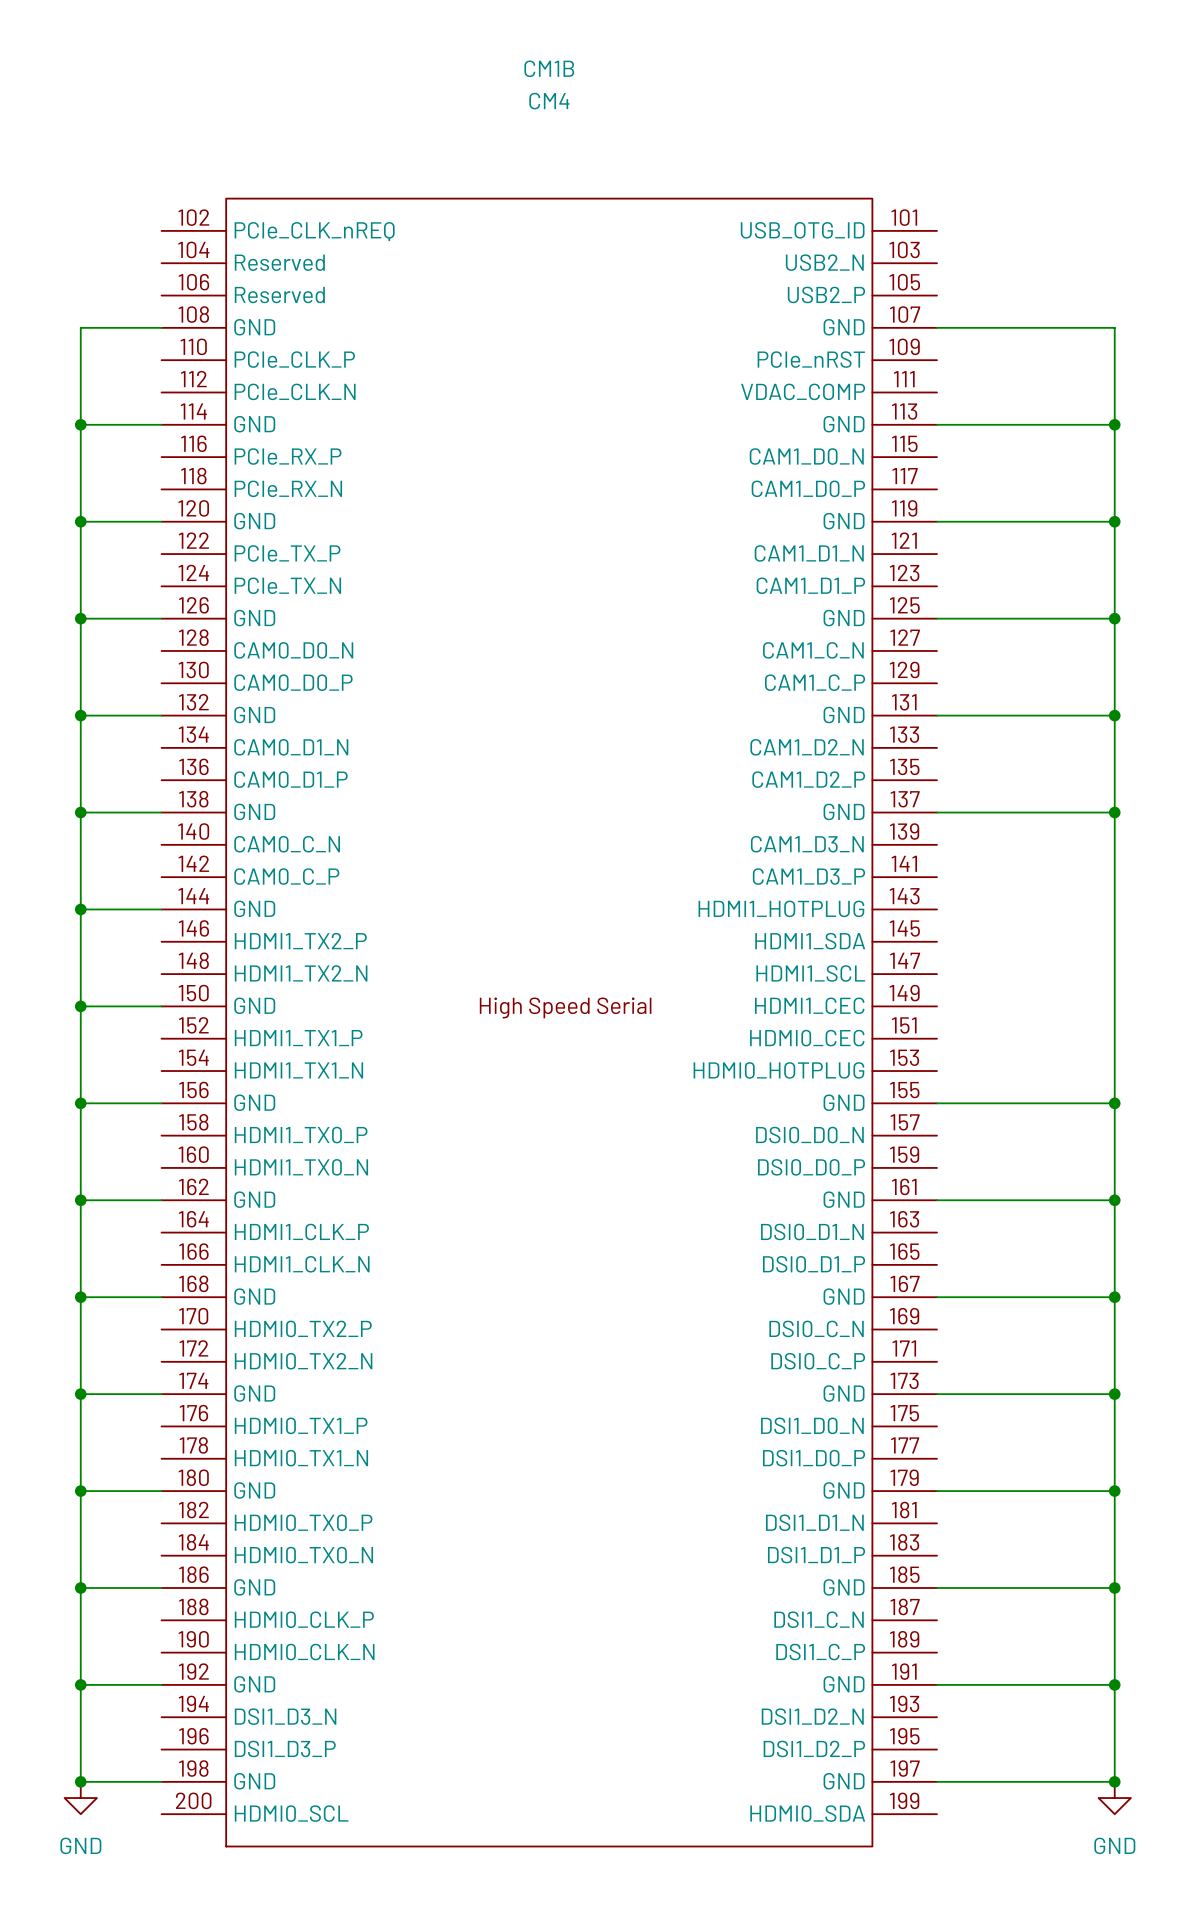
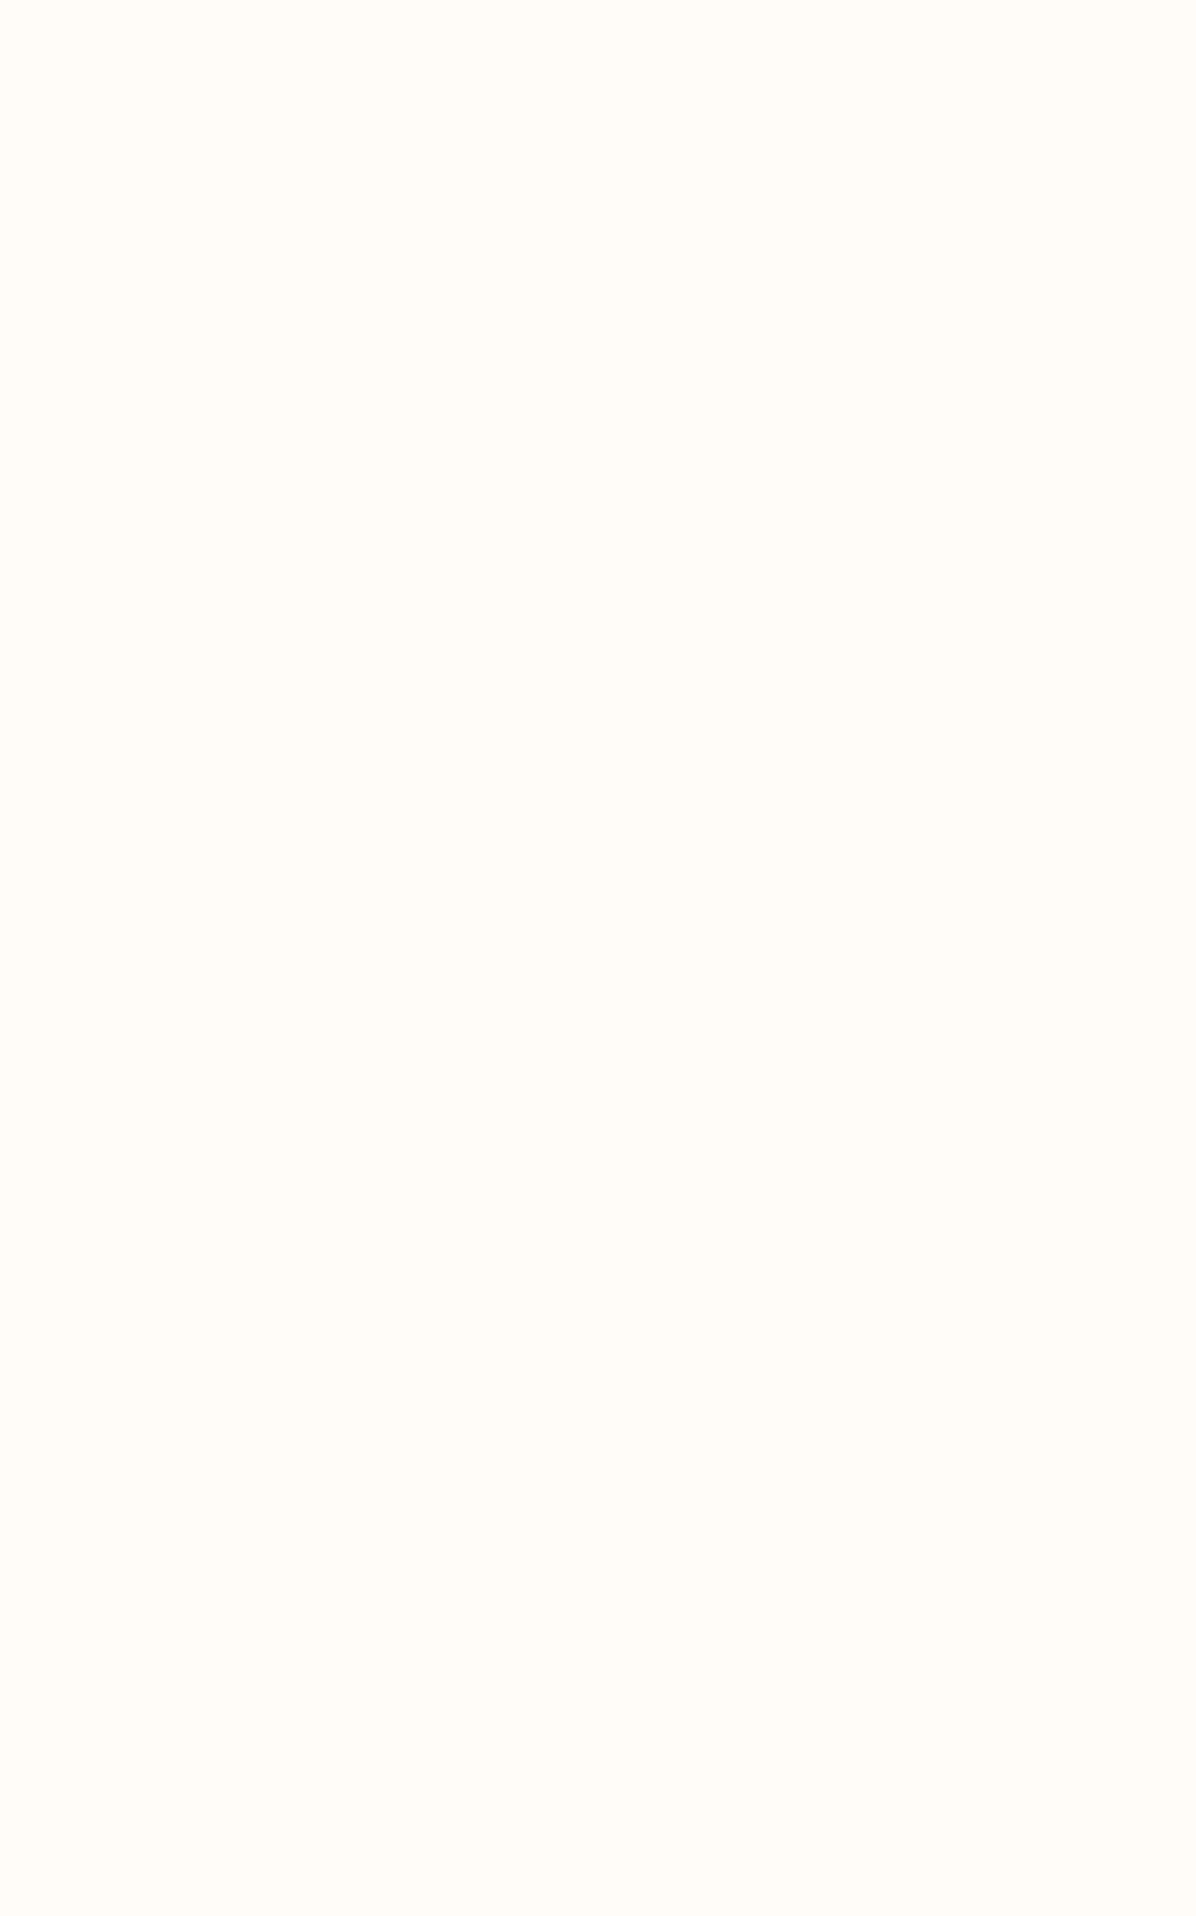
wire: (161, 327) (80, 327) (80, 1781) (161, 1781) -> none
wire: (937, 327) (1114, 327) (1114, 1781) (937, 1781) -> none
wire: (80, 424) (161, 424) -> none
junction: (80, 424) -> none
wire: (937, 424) (1114, 424) -> none
junction: (1114, 424) -> none
wire: (80, 521) (161, 521) -> none
junction: (80, 521) -> none
wire: (937, 521) (1114, 521) -> none
junction: (1114, 521) -> none
wire: (80, 618) (161, 618) -> none
junction: (80, 618) -> none
wire: (937, 618) (1114, 618) -> none
junction: (1114, 618) -> none
wire: (80, 715) (161, 715) -> none
junction: (80, 715) -> none
wire: (937, 715) (1114, 715) -> none
junction: (1114, 715) -> none
wire: (80, 812) (161, 812) -> none
junction: (80, 812) -> none
wire: (937, 812) (1114, 812) -> none
junction: (1114, 812) -> none
wire: (80, 909) (161, 909) -> none
junction: (80, 909) -> none
wire: (80, 1006) (161, 1006) -> none
junction: (80, 1006) -> none
CM1B: CM4 (549, 1022) -> none
wire: (80, 1103) (161, 1103) -> none
junction: (80, 1103) -> none
wire: (937, 1103) (1114, 1103) -> none
junction: (1114, 1103) -> none
wire: (80, 1200) (161, 1200) -> none
junction: (80, 1200) -> none
wire: (937, 1200) (1114, 1200) -> none
junction: (1114, 1200) -> none
wire: (80, 1297) (161, 1297) -> none
junction: (80, 1297) -> none
wire: (937, 1297) (1114, 1297) -> none
junction: (1114, 1297) -> none
wire: (80, 1394) (161, 1394) -> none
junction: (80, 1394) -> none
wire: (937, 1394) (1114, 1394) -> none
junction: (1114, 1394) -> none
wire: (80, 1491) (161, 1491) -> none
junction: (80, 1491) -> none
wire: (937, 1491) (1114, 1491) -> none
junction: (1114, 1491) -> none
wire: (80, 1588) (161, 1588) -> none
junction: (80, 1588) -> none
wire: (937, 1588) (1114, 1588) -> none
junction: (1114, 1588) -> none
wire: (80, 1684) (161, 1684) -> none
junction: (80, 1684) -> none
wire: (937, 1684) (1114, 1684) -> none
junction: (1114, 1684) -> none
junction: (80, 1781) -> none
junction: (1114, 1781) -> none
power symbol: GND (80, 1798) -> none
power symbol: GND (1114, 1798) -> none

